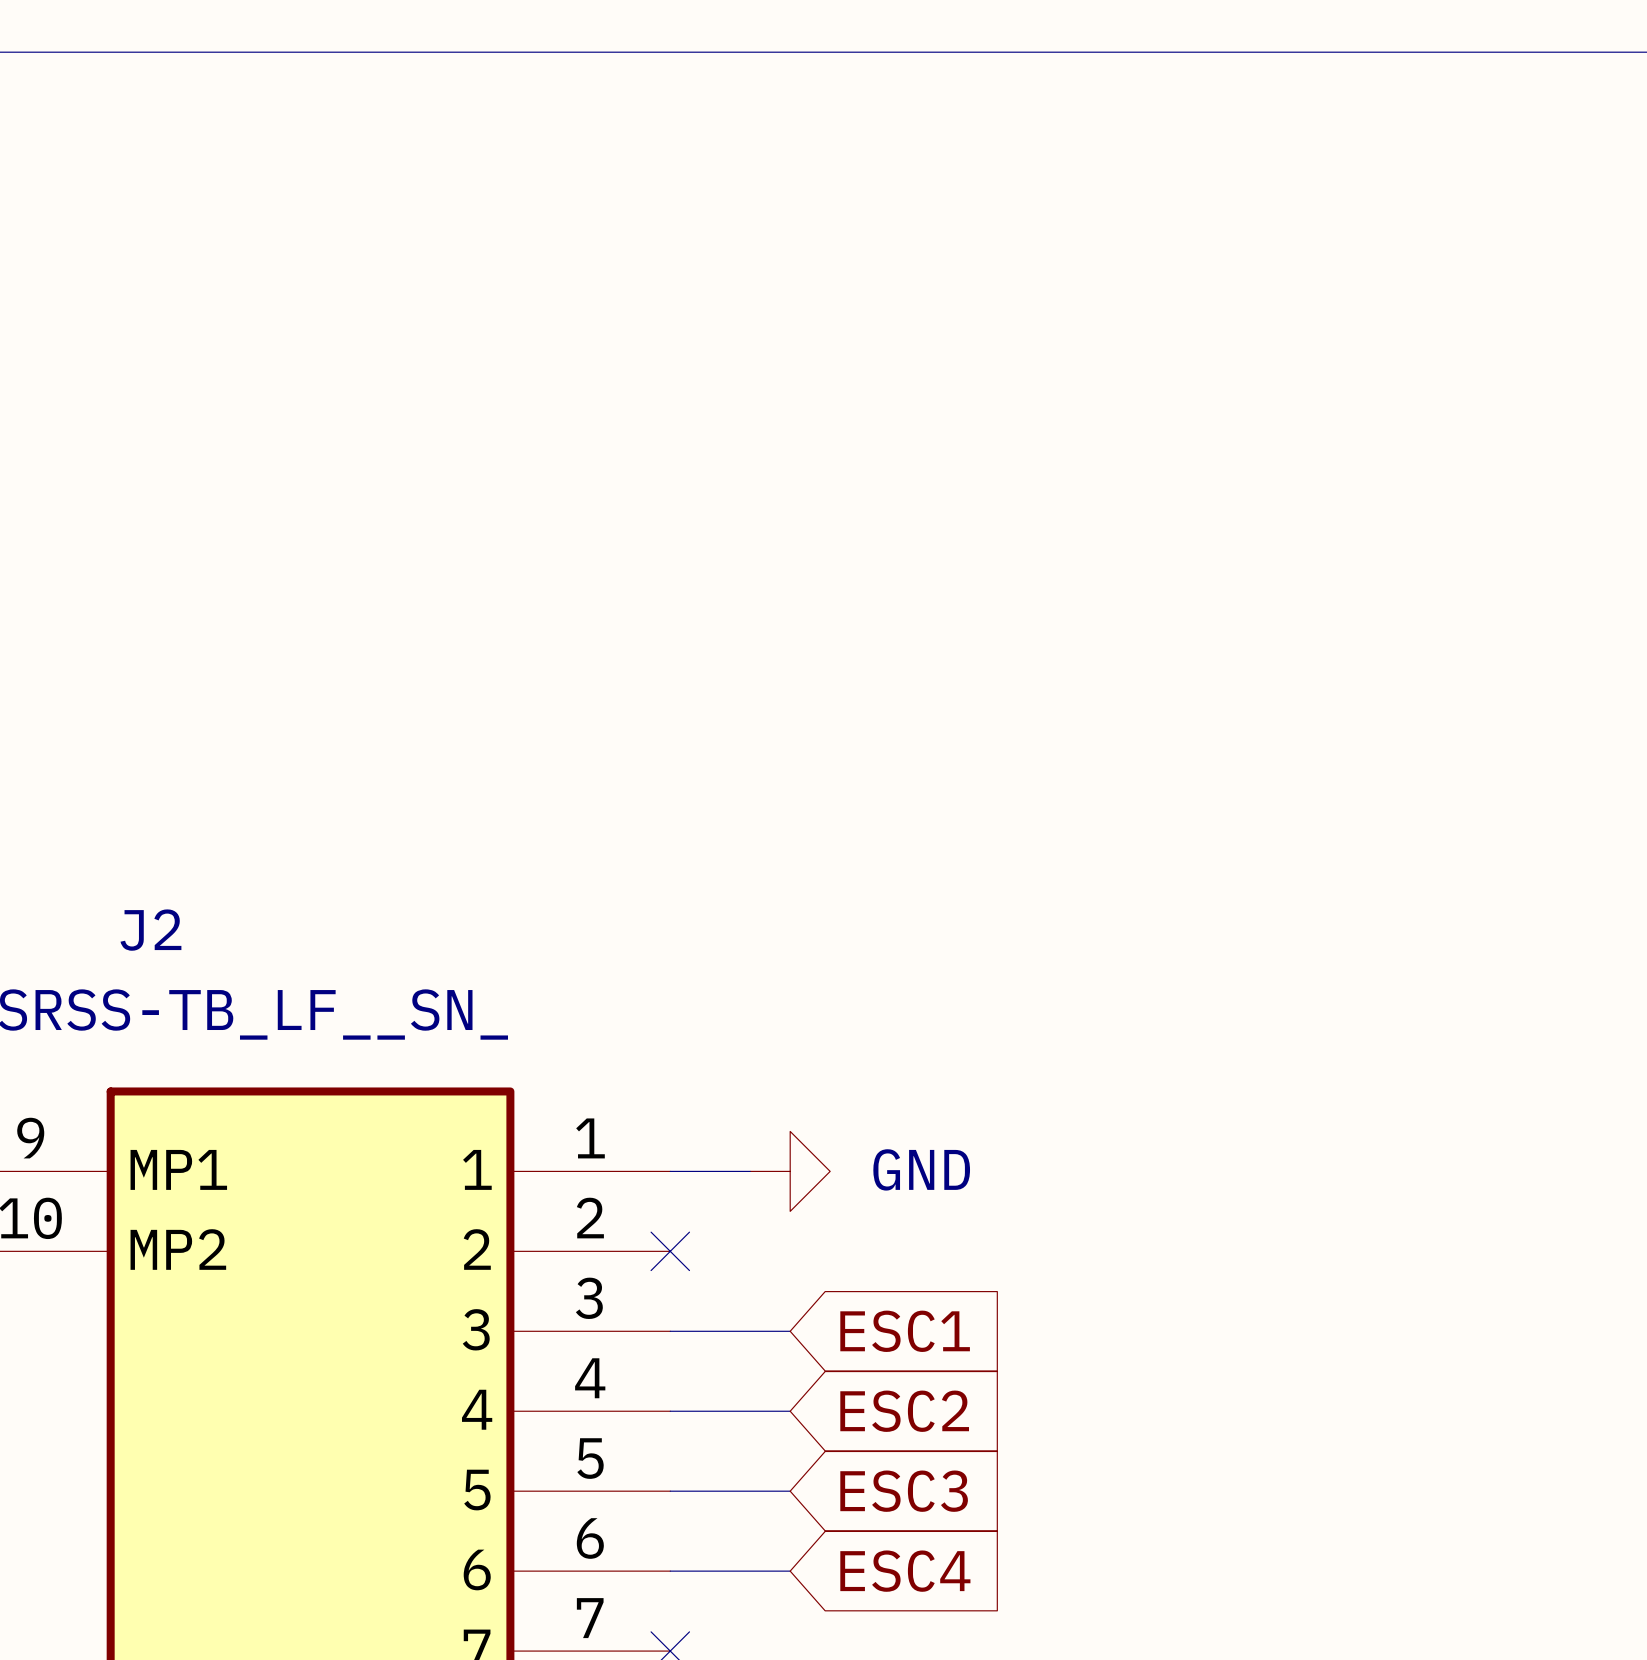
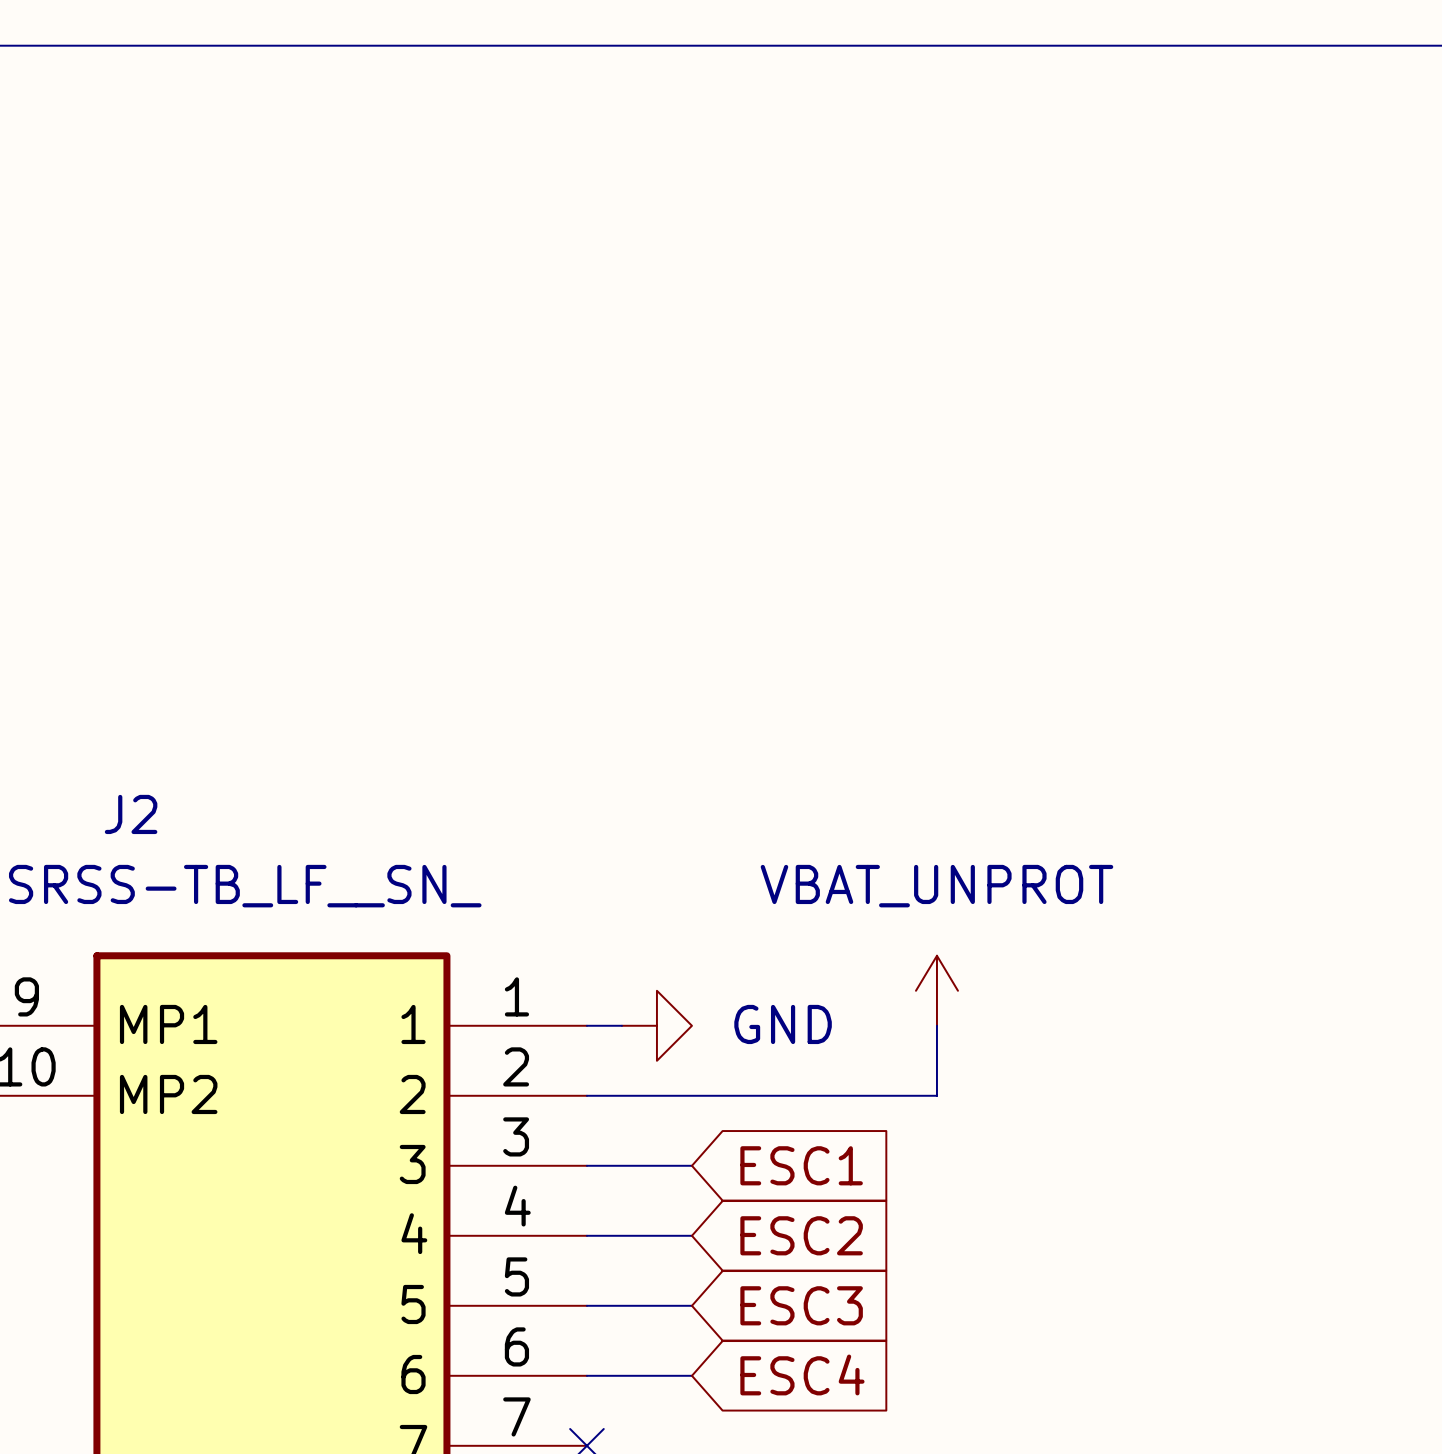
power symbol: none -> VBAT_UNPROT (936, 990)
power symbol position: GND (790, 1171) -> GND (656, 1025)
wire: none -> (936, 1025) (936, 1095) (586, 1095)
no-connect mark: (670, 1251) -> none

